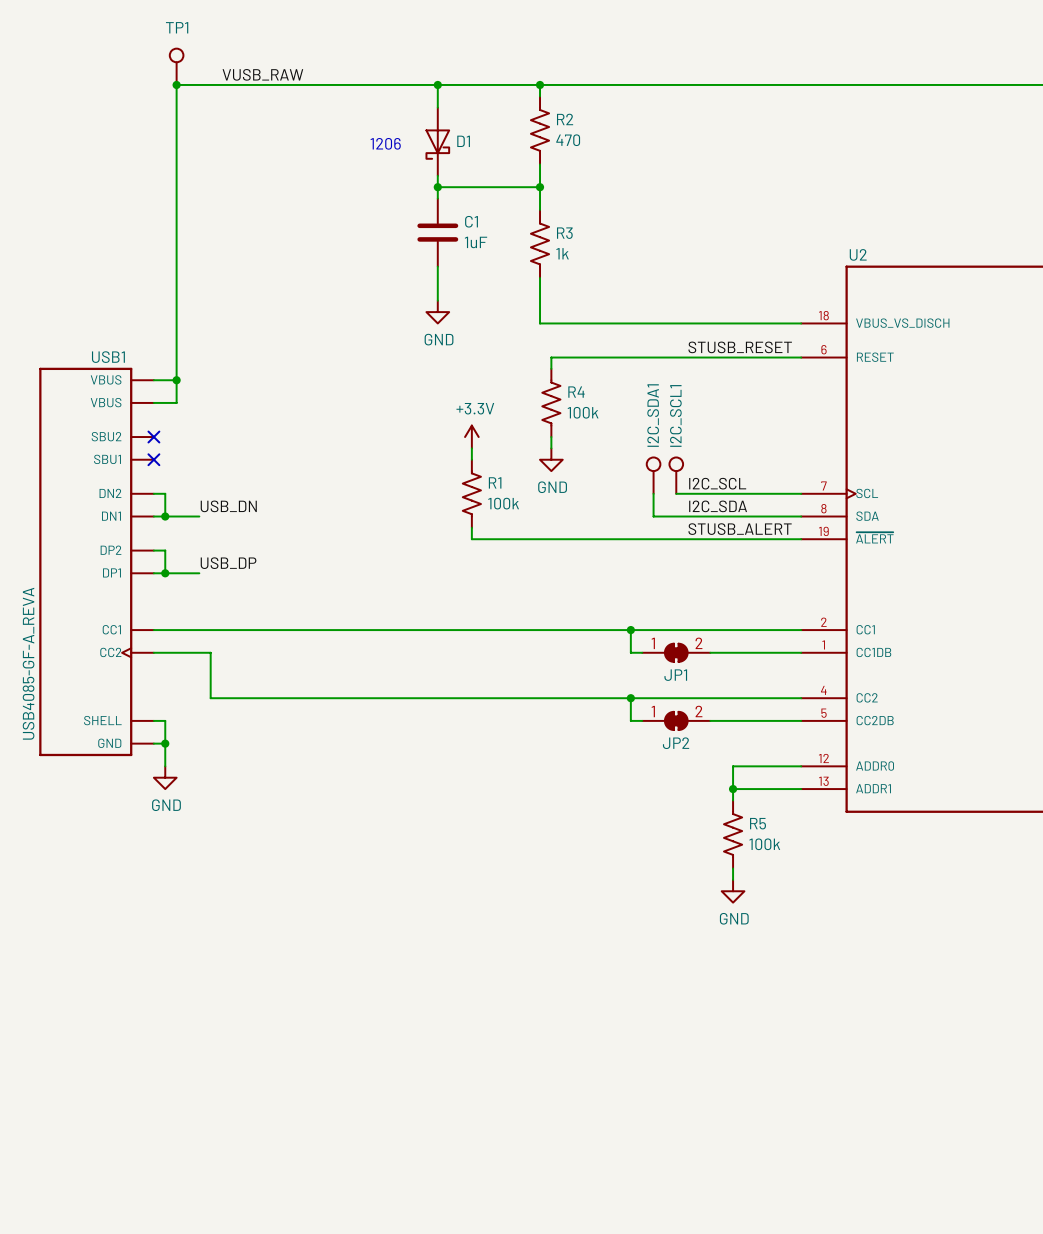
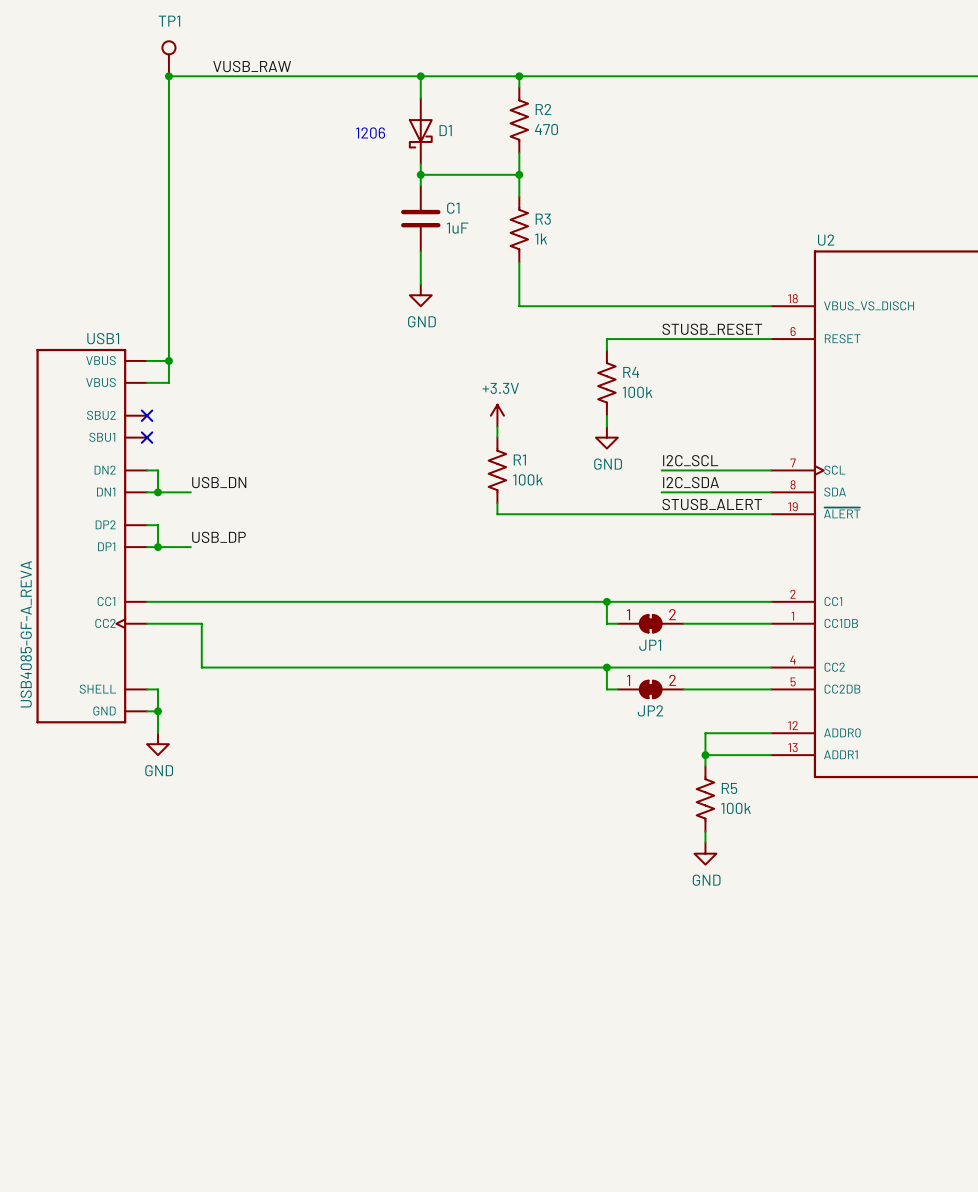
wire: (630, 357) (551, 357) (551, 368) -> (606, 339) (606, 350)
R4 position: (551, 402) -> (606, 382)
power symbol position: +3.3V (471, 437) -> +3.3V (497, 415)
wire: (551, 437) (551, 448) -> (497, 426) (497, 437)
wire: (471, 448) (471, 459) -> (606, 415) (606, 426)
power symbol position: GND (551, 459) -> GND (606, 437)
I2C_SDA1: (653, 475) -> none
I2C_SCL1: (676, 475) -> none
R1 position: (471, 493) -> (497, 470)
wire: (653, 493) (653, 516) (687, 516) -> none
wire: (676, 493) (687, 493) -> none
wire: (471, 527) (471, 539) (517, 539) -> (497, 503) (497, 514)

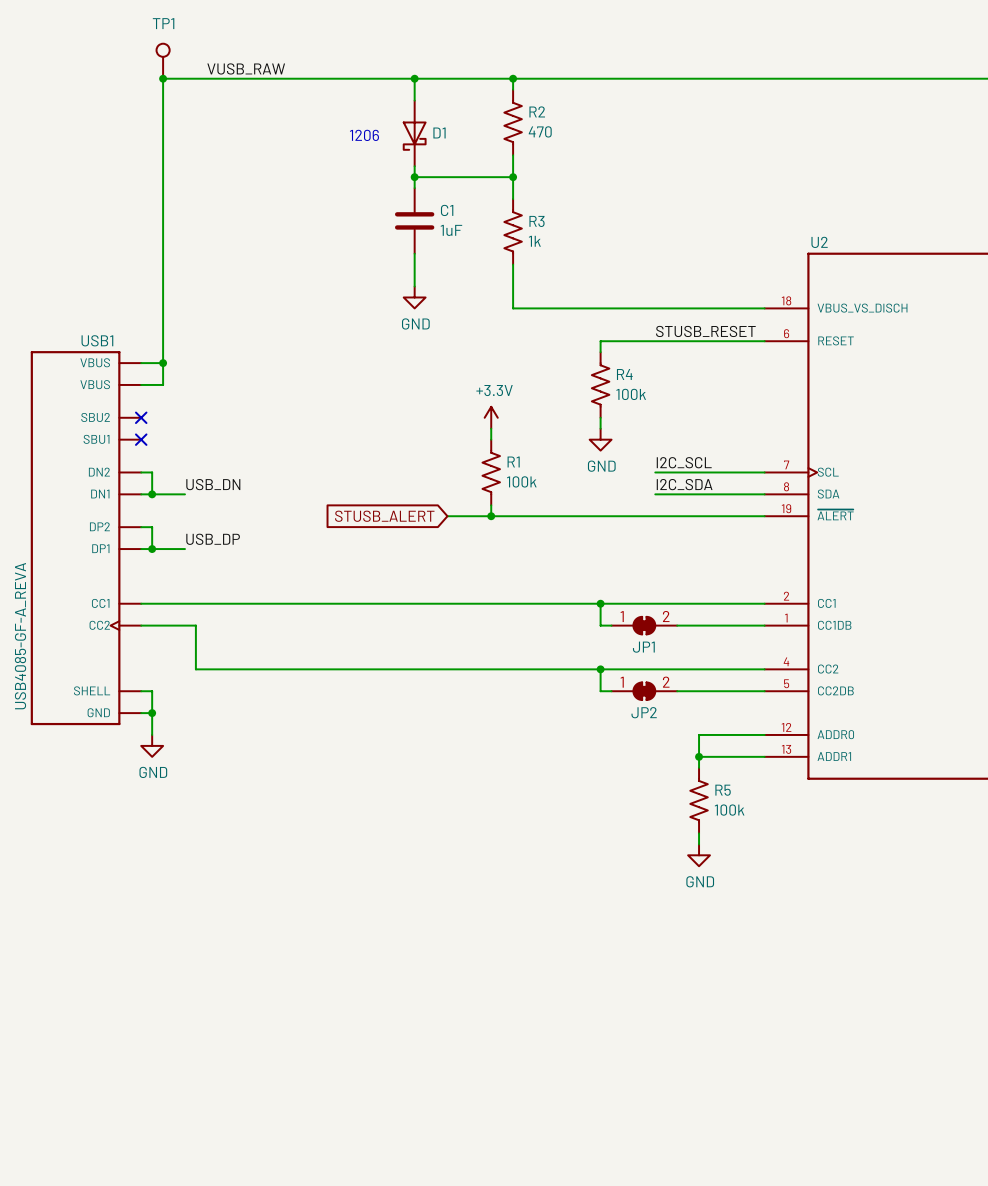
label: STUSB_ALERT (712, 504) -> none
global label: none -> STUSB_ALERT (384, 516)
wire: none -> (447, 516) (491, 516)
junction: none -> (491, 516)

